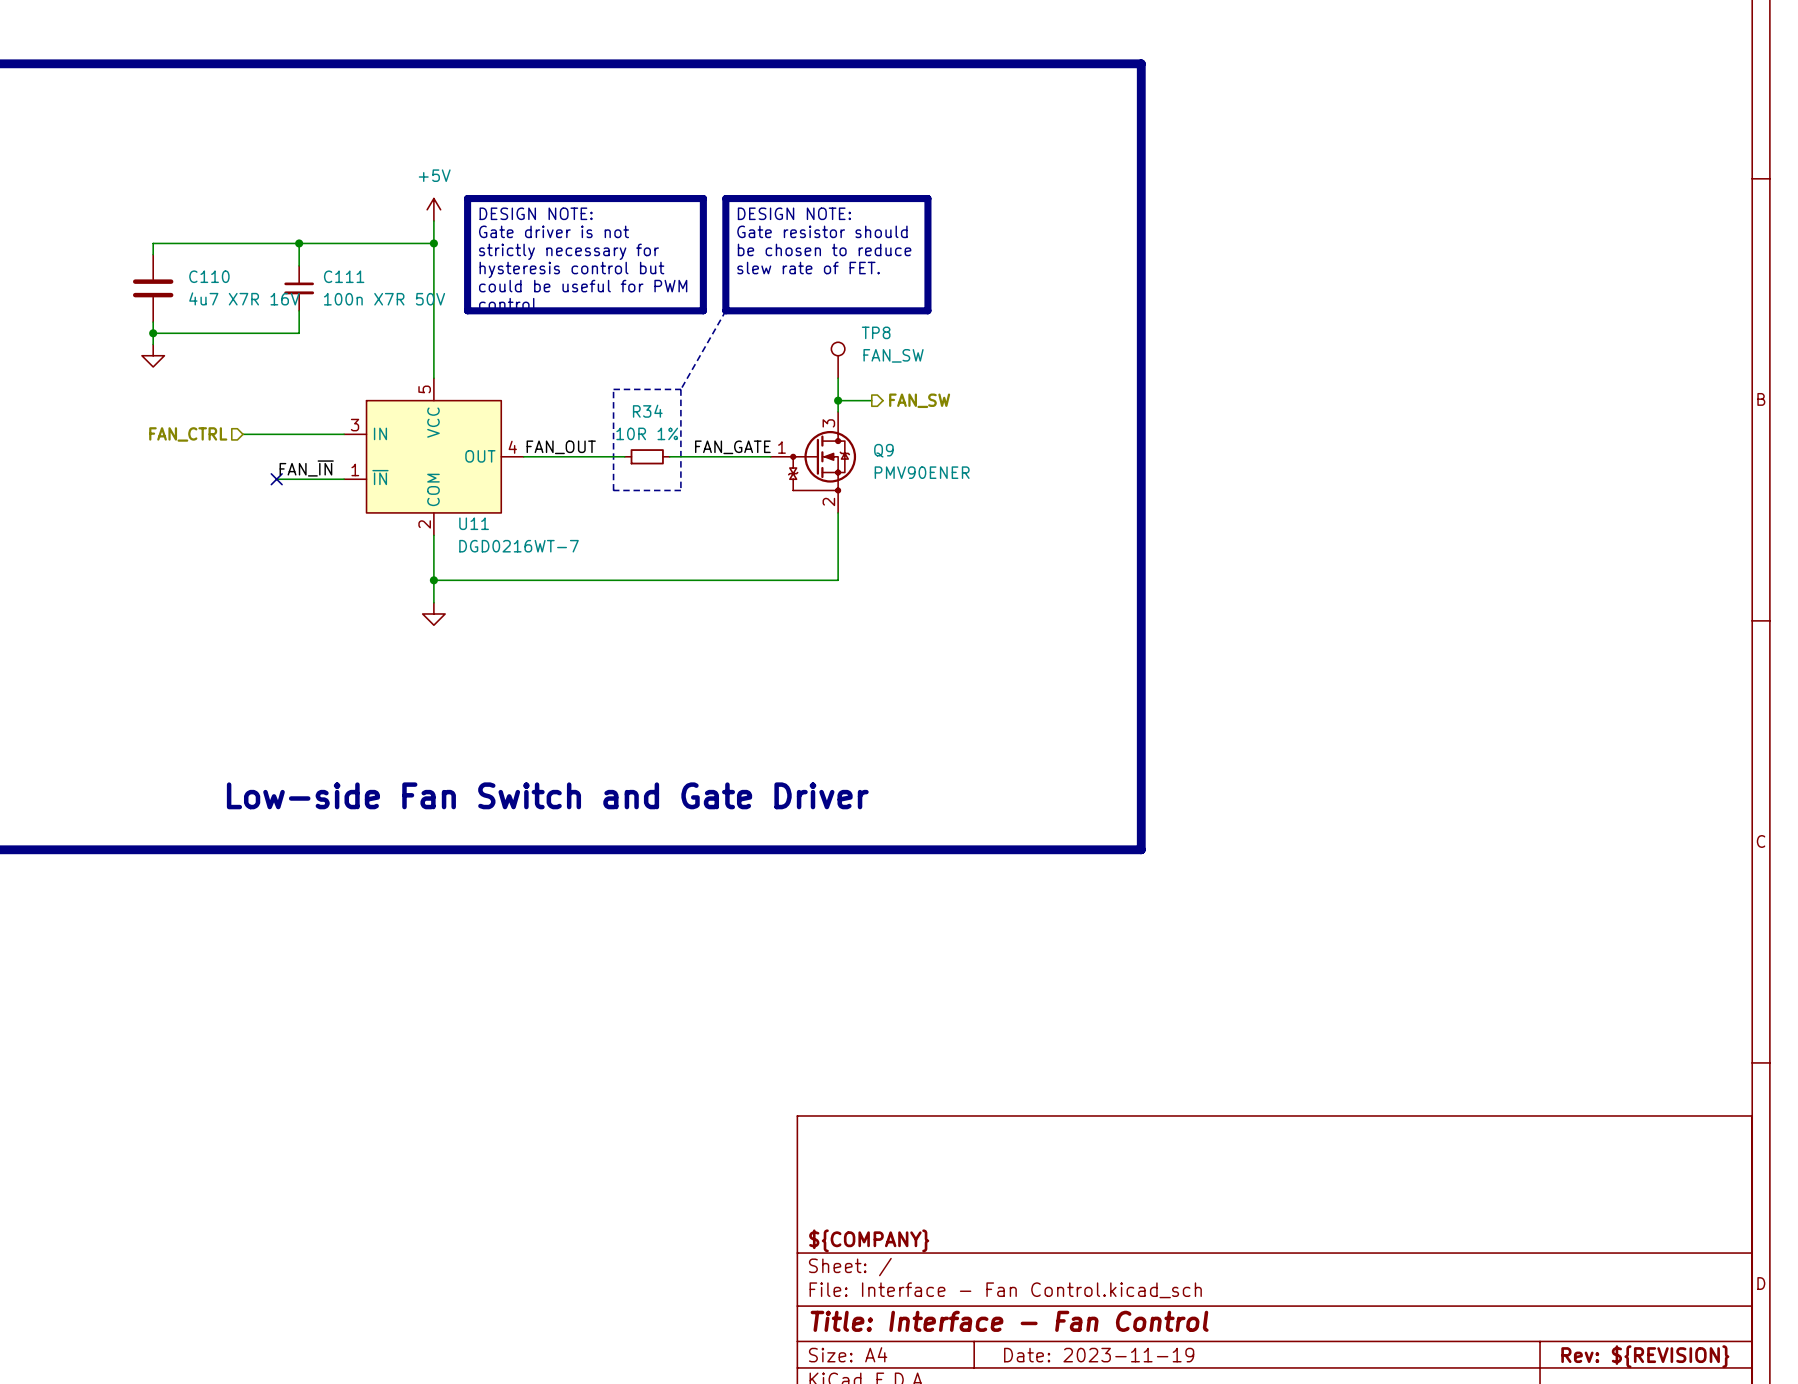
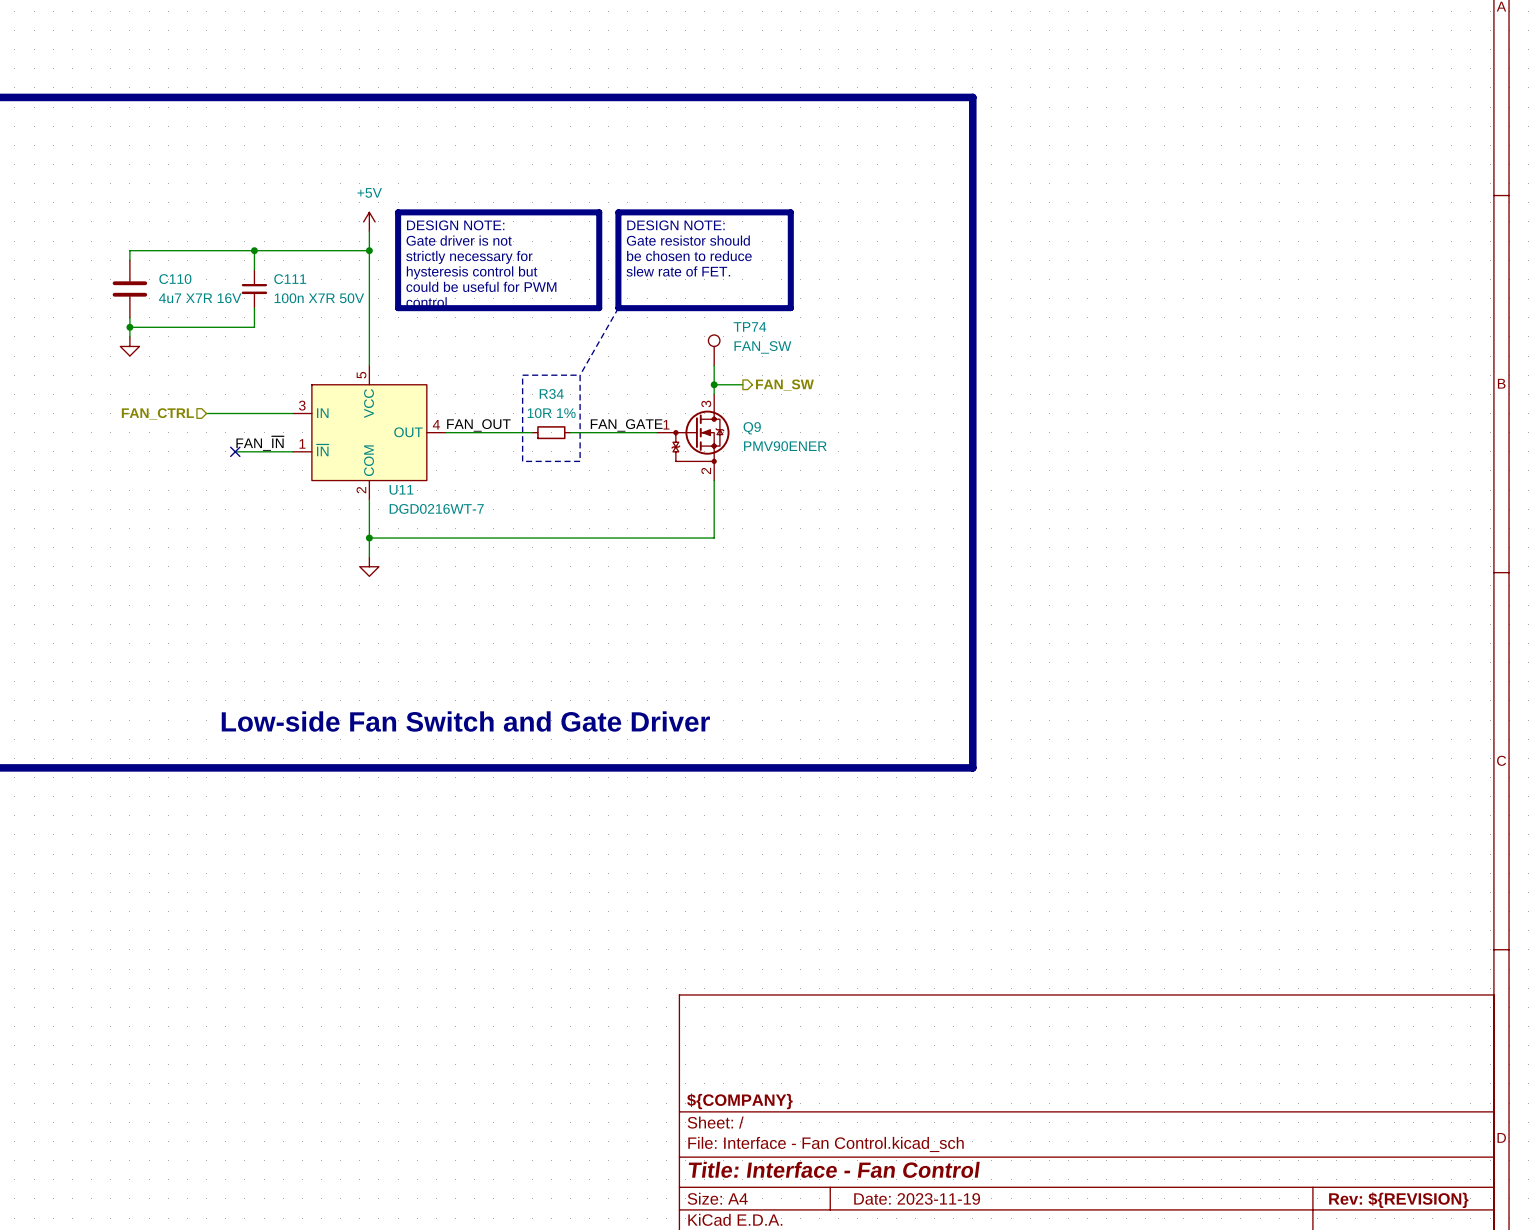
TP8 name: TP8 (876, 332) -> TP74 (749, 326)

